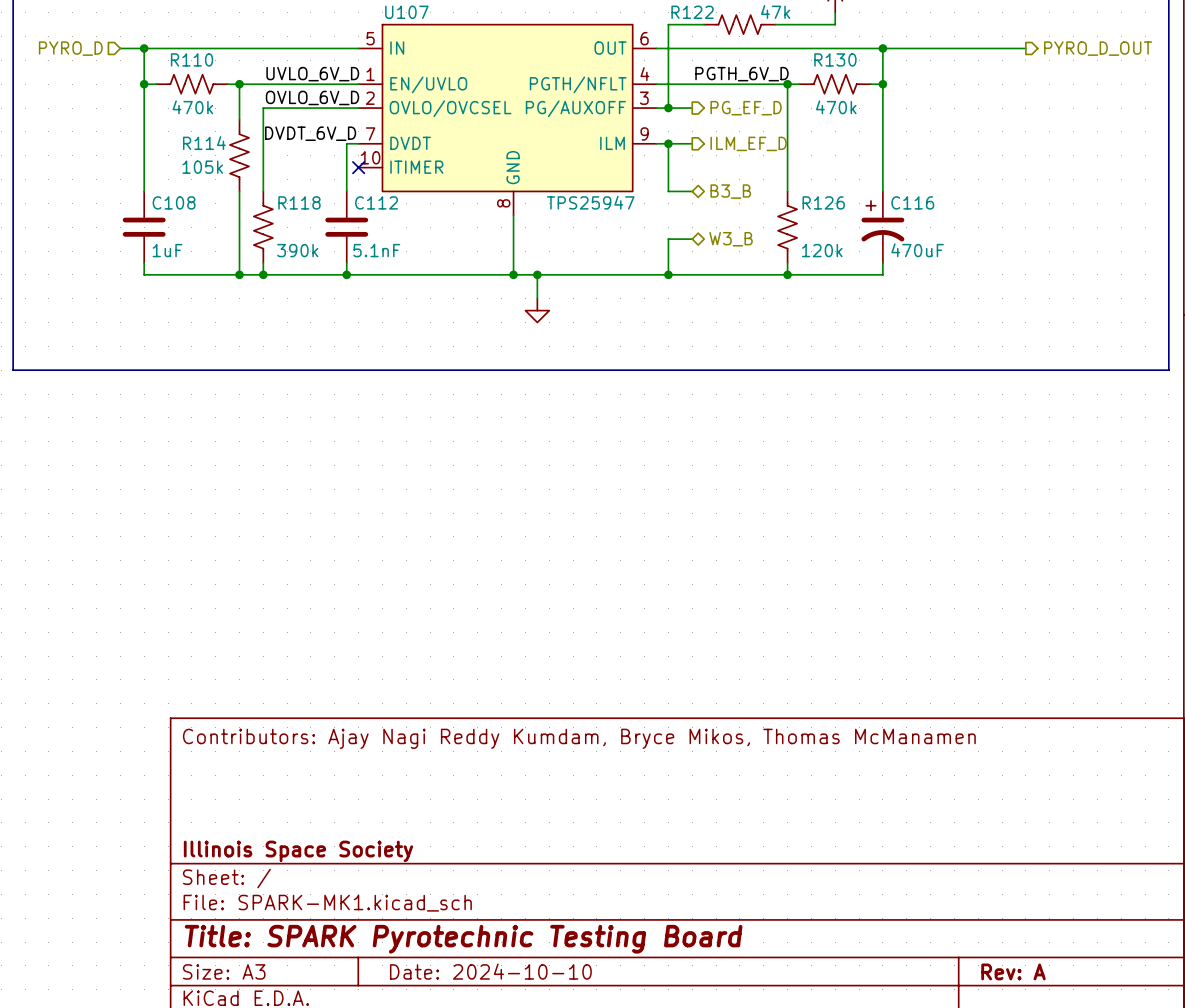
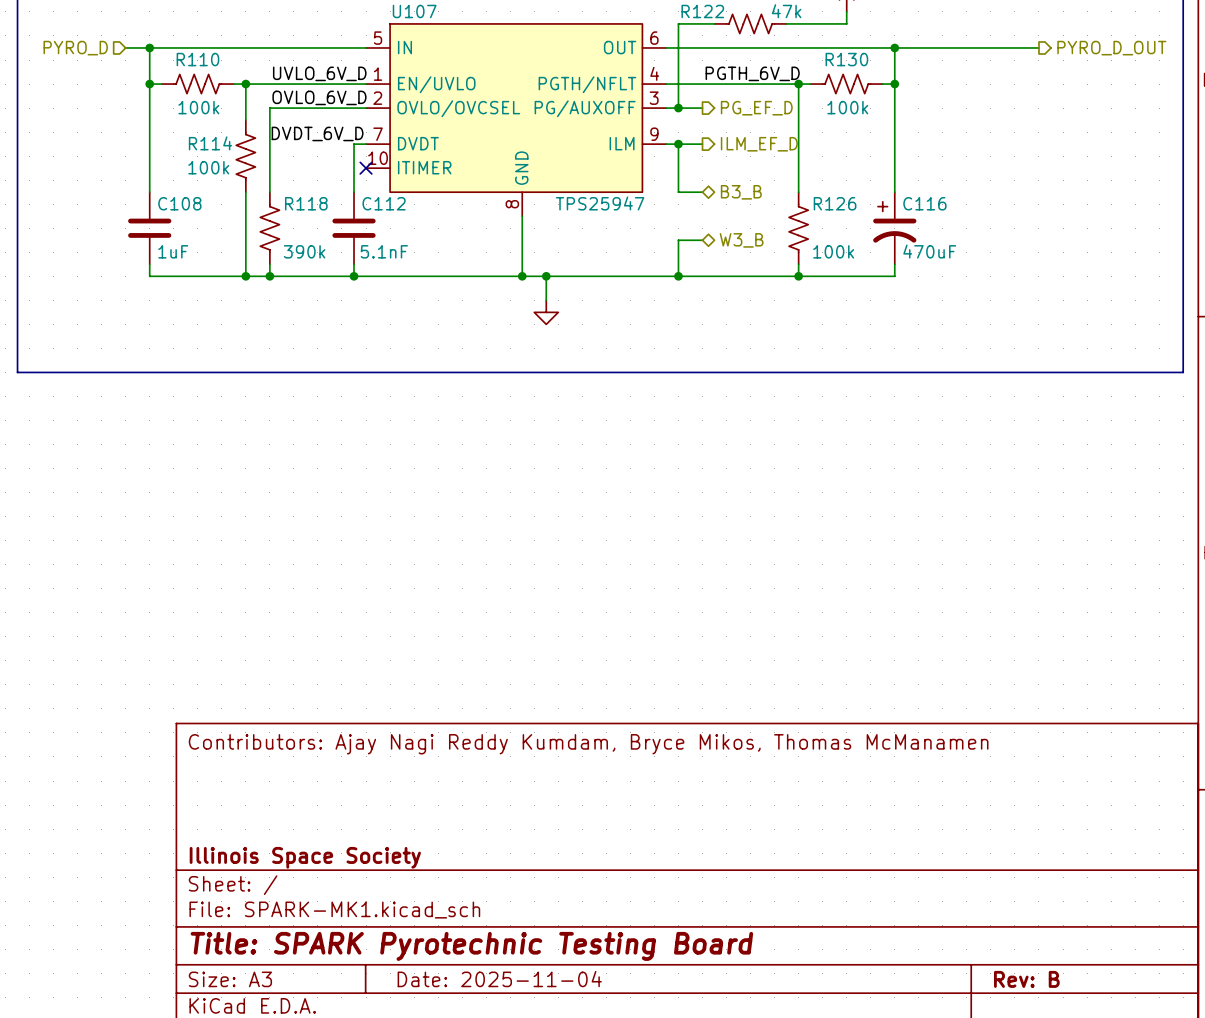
R110 value: 470k (192, 107) -> 100k (198, 107)
R130 value: 470k (836, 107) -> 100k (847, 107)
R114 value: 105k (202, 167) -> 100k (208, 167)
R126 value: 120k (822, 250) -> 100k (833, 251)
title block: Date: 2024-10-10 (490, 971) -> Date: 2025-11-04 (499, 979)
title block: Rev: A (1013, 971) -> Rev: B (1026, 979)

